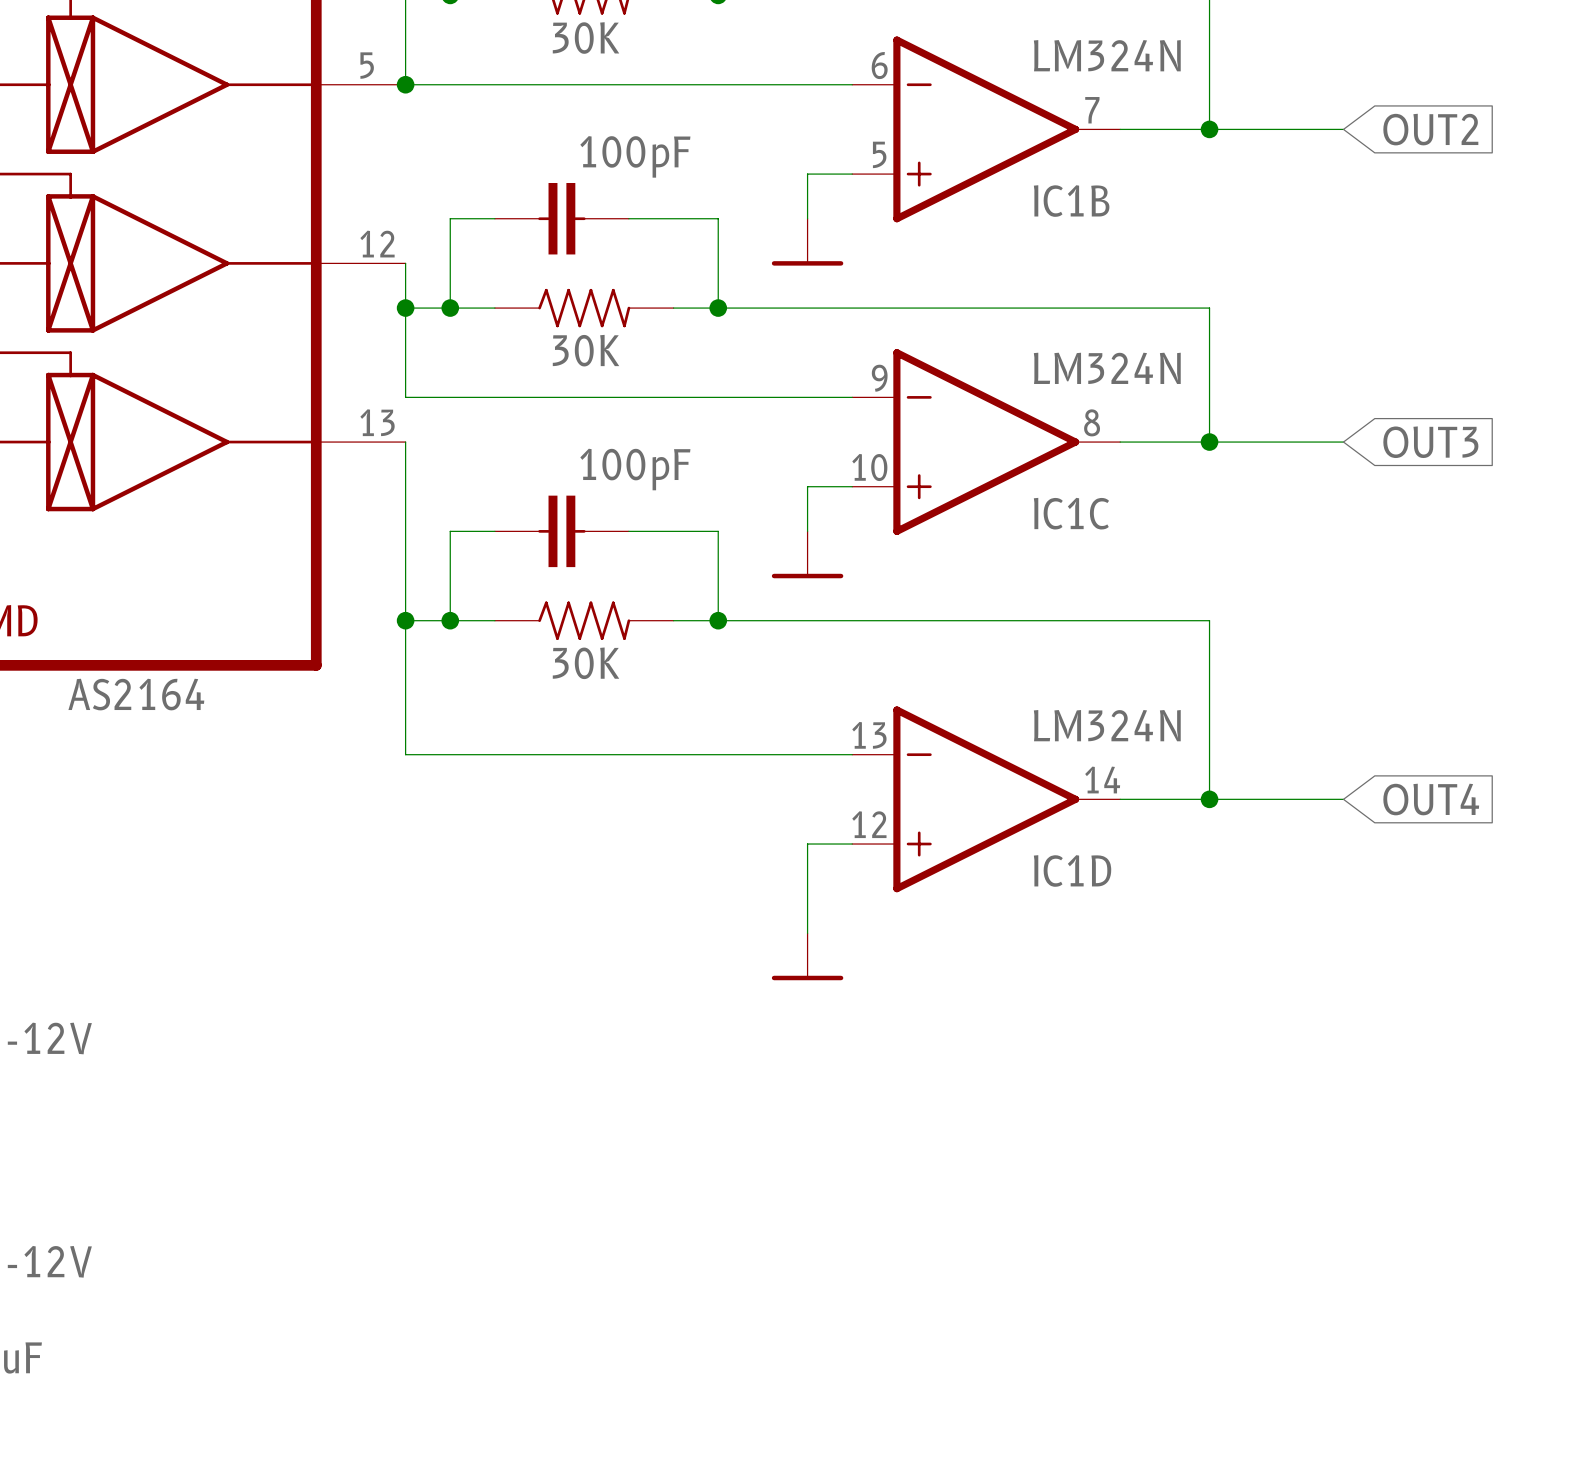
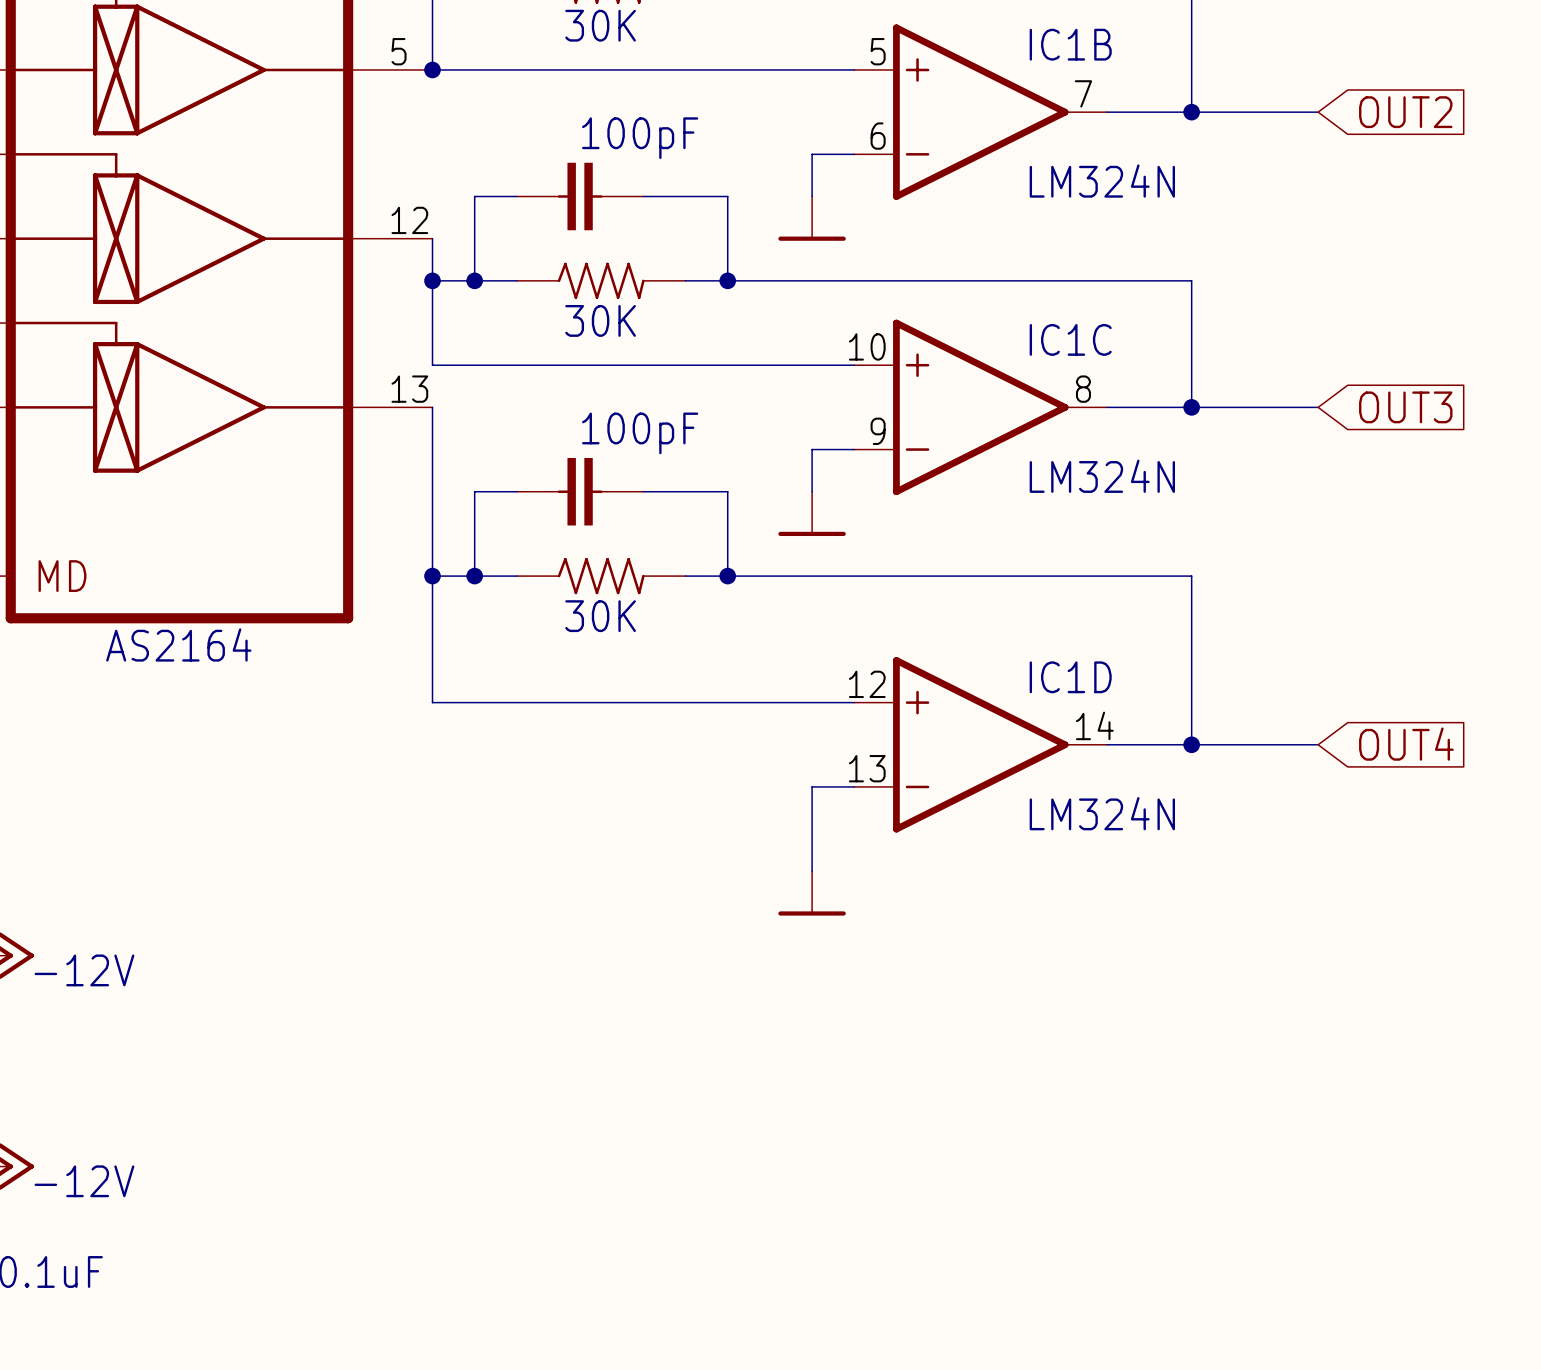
IC1B flip: as is (986, 129) -> up-down (980, 112)
IC1C flip: as is (986, 442) -> up-down (980, 407)
IC1D flip: as is (986, 799) -> up-down (980, 744)

